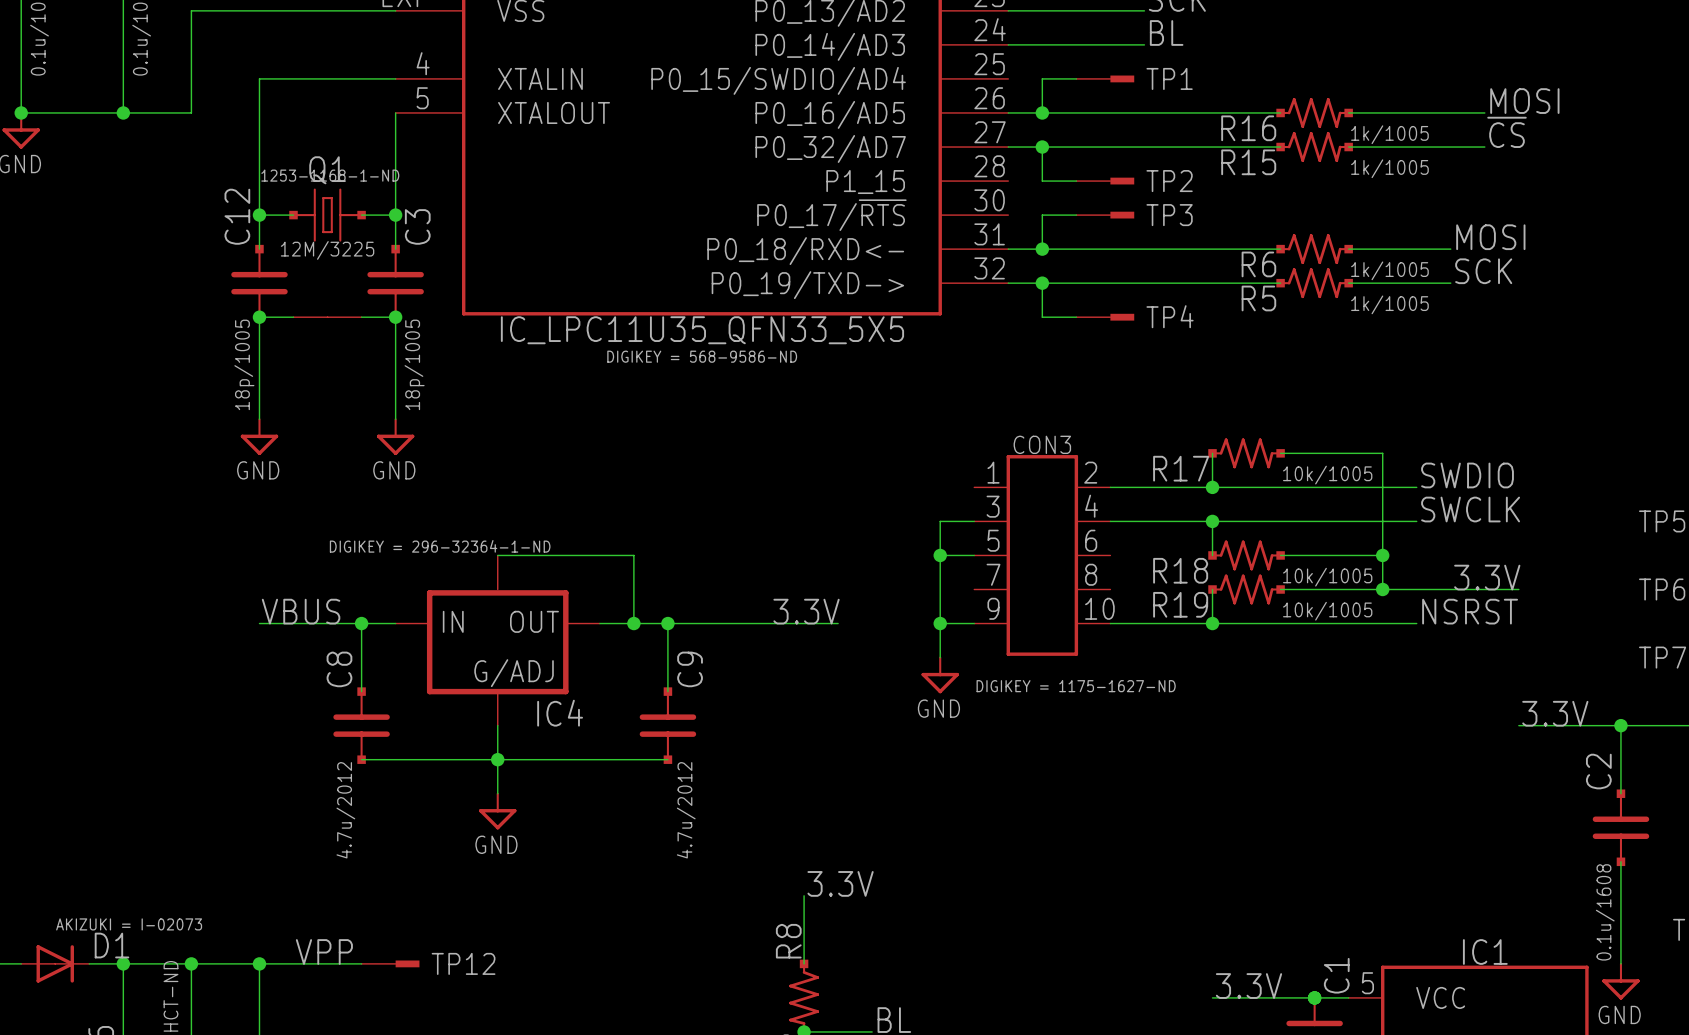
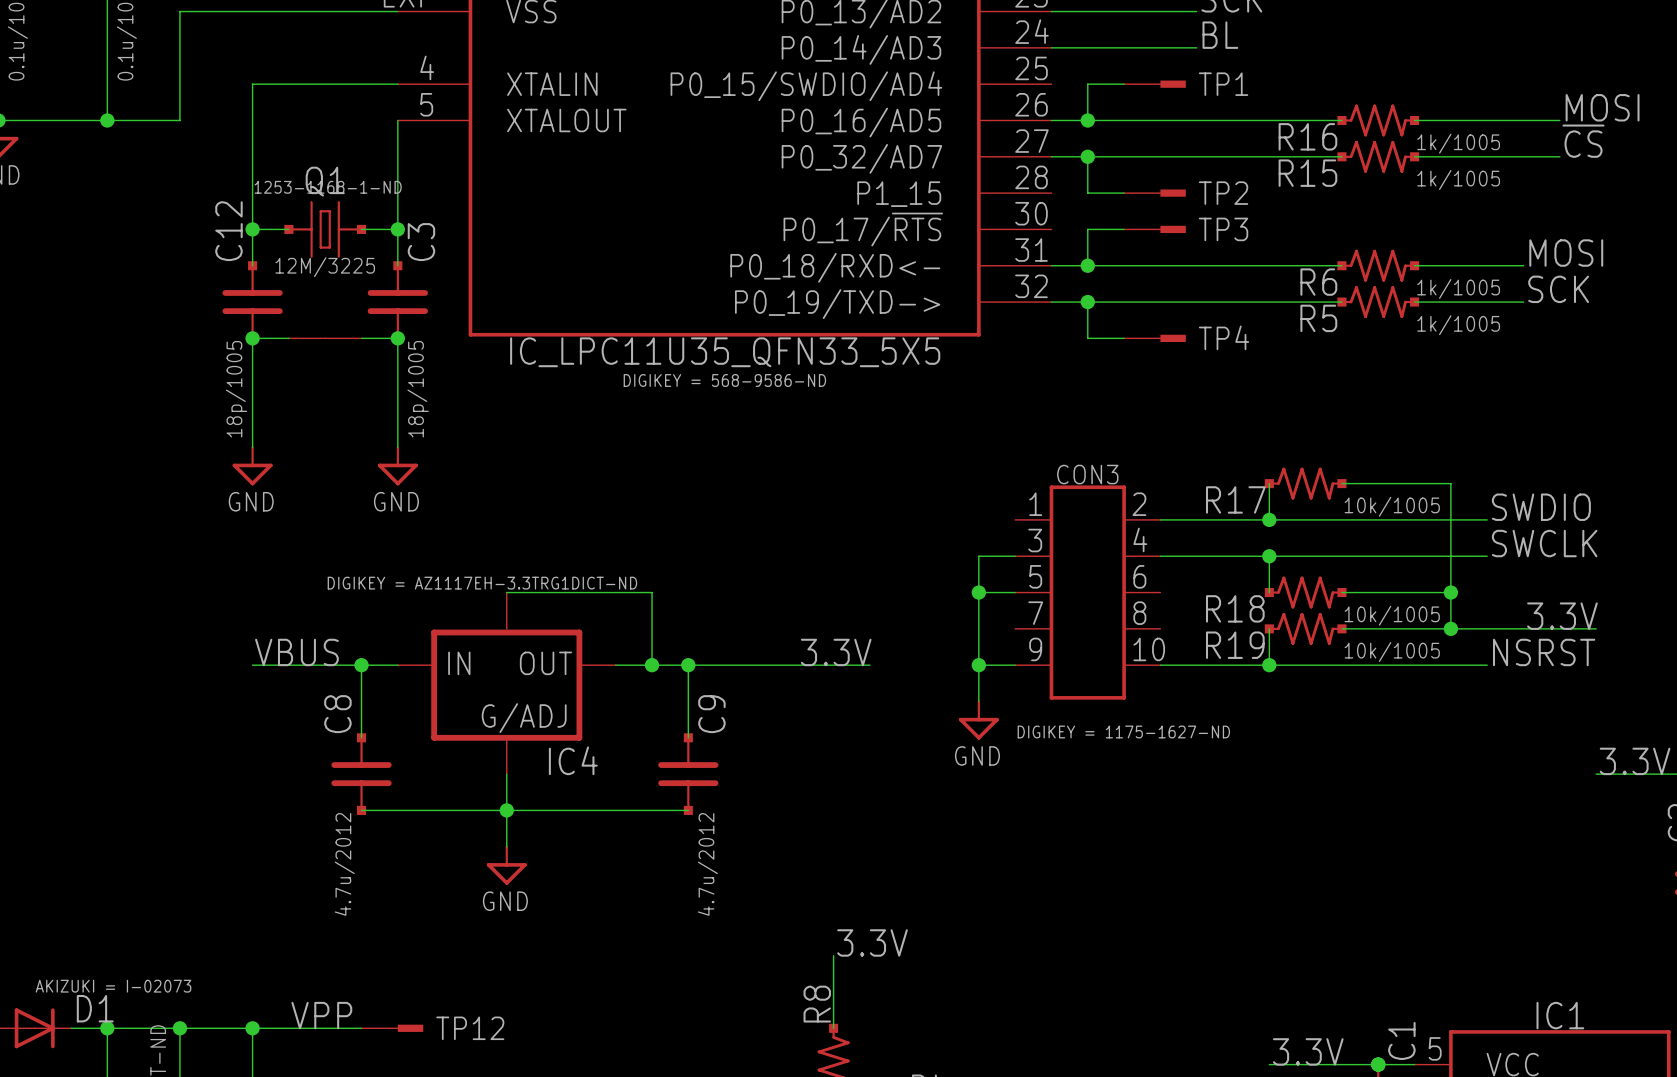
IC4 text: DIGIKEY = 296-32364-1-ND (440, 546) -> DIGIKEY = AZ1117EH-3.3TRG1DICT-ND (482, 583)

